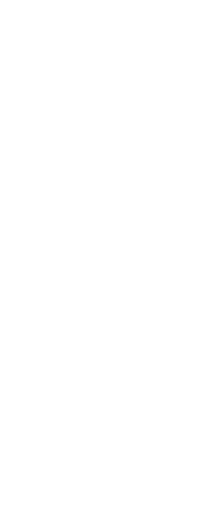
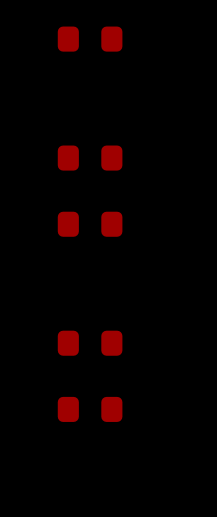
part: none -> (90, 39)
part: none -> (90, 158)
part: none -> (90, 224)
part: none -> (90, 343)
part: none -> (90, 409)

